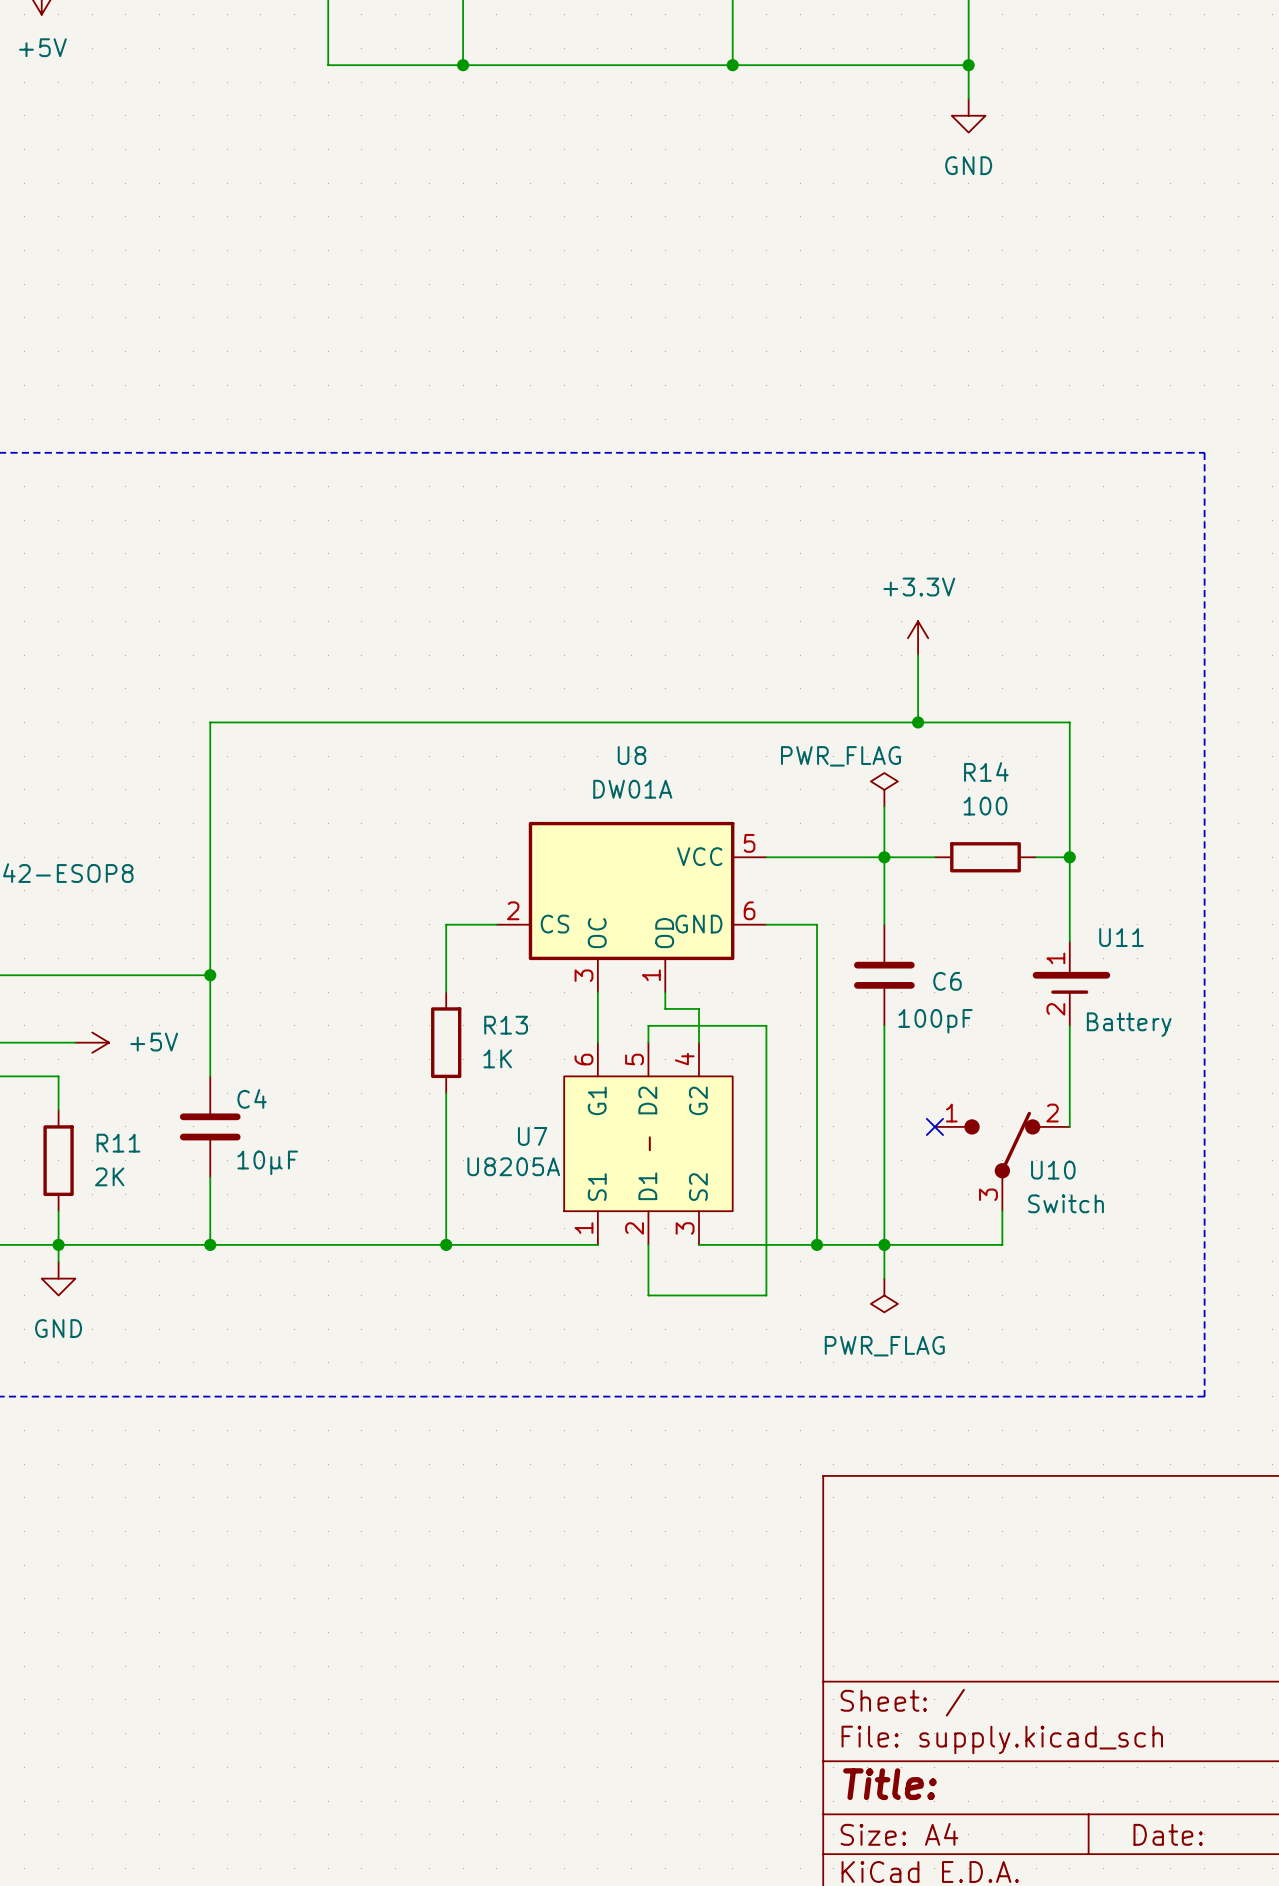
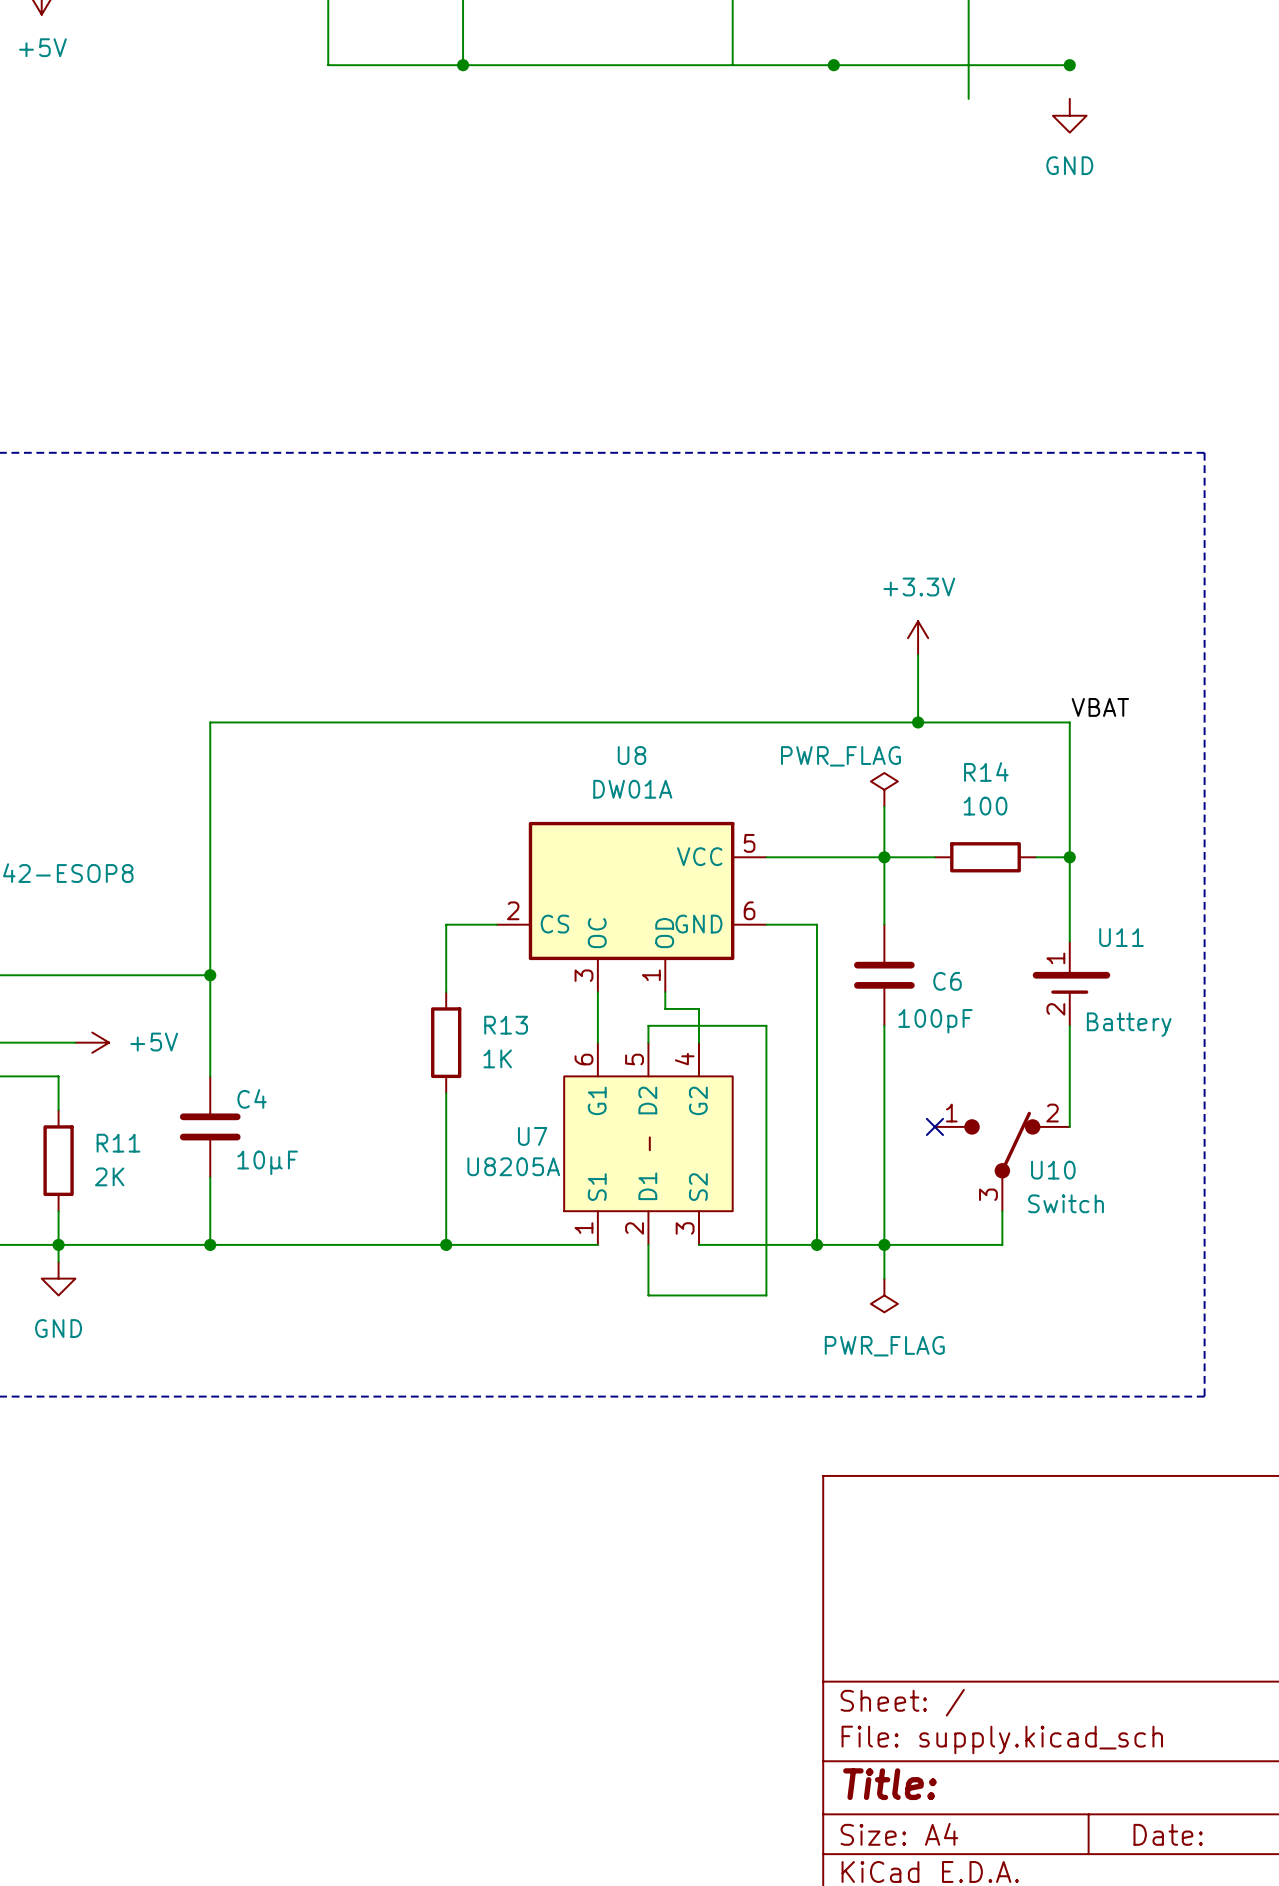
junction: (732, 65) -> none
junction: none -> (833, 65)
wire: none -> (968, 65) (1069, 65)
junction: (968, 65) -> none
junction: none -> (1069, 65)
power symbol position: GND (968, 115) -> GND (1069, 115)
label: none -> VBAT (1100, 707)

